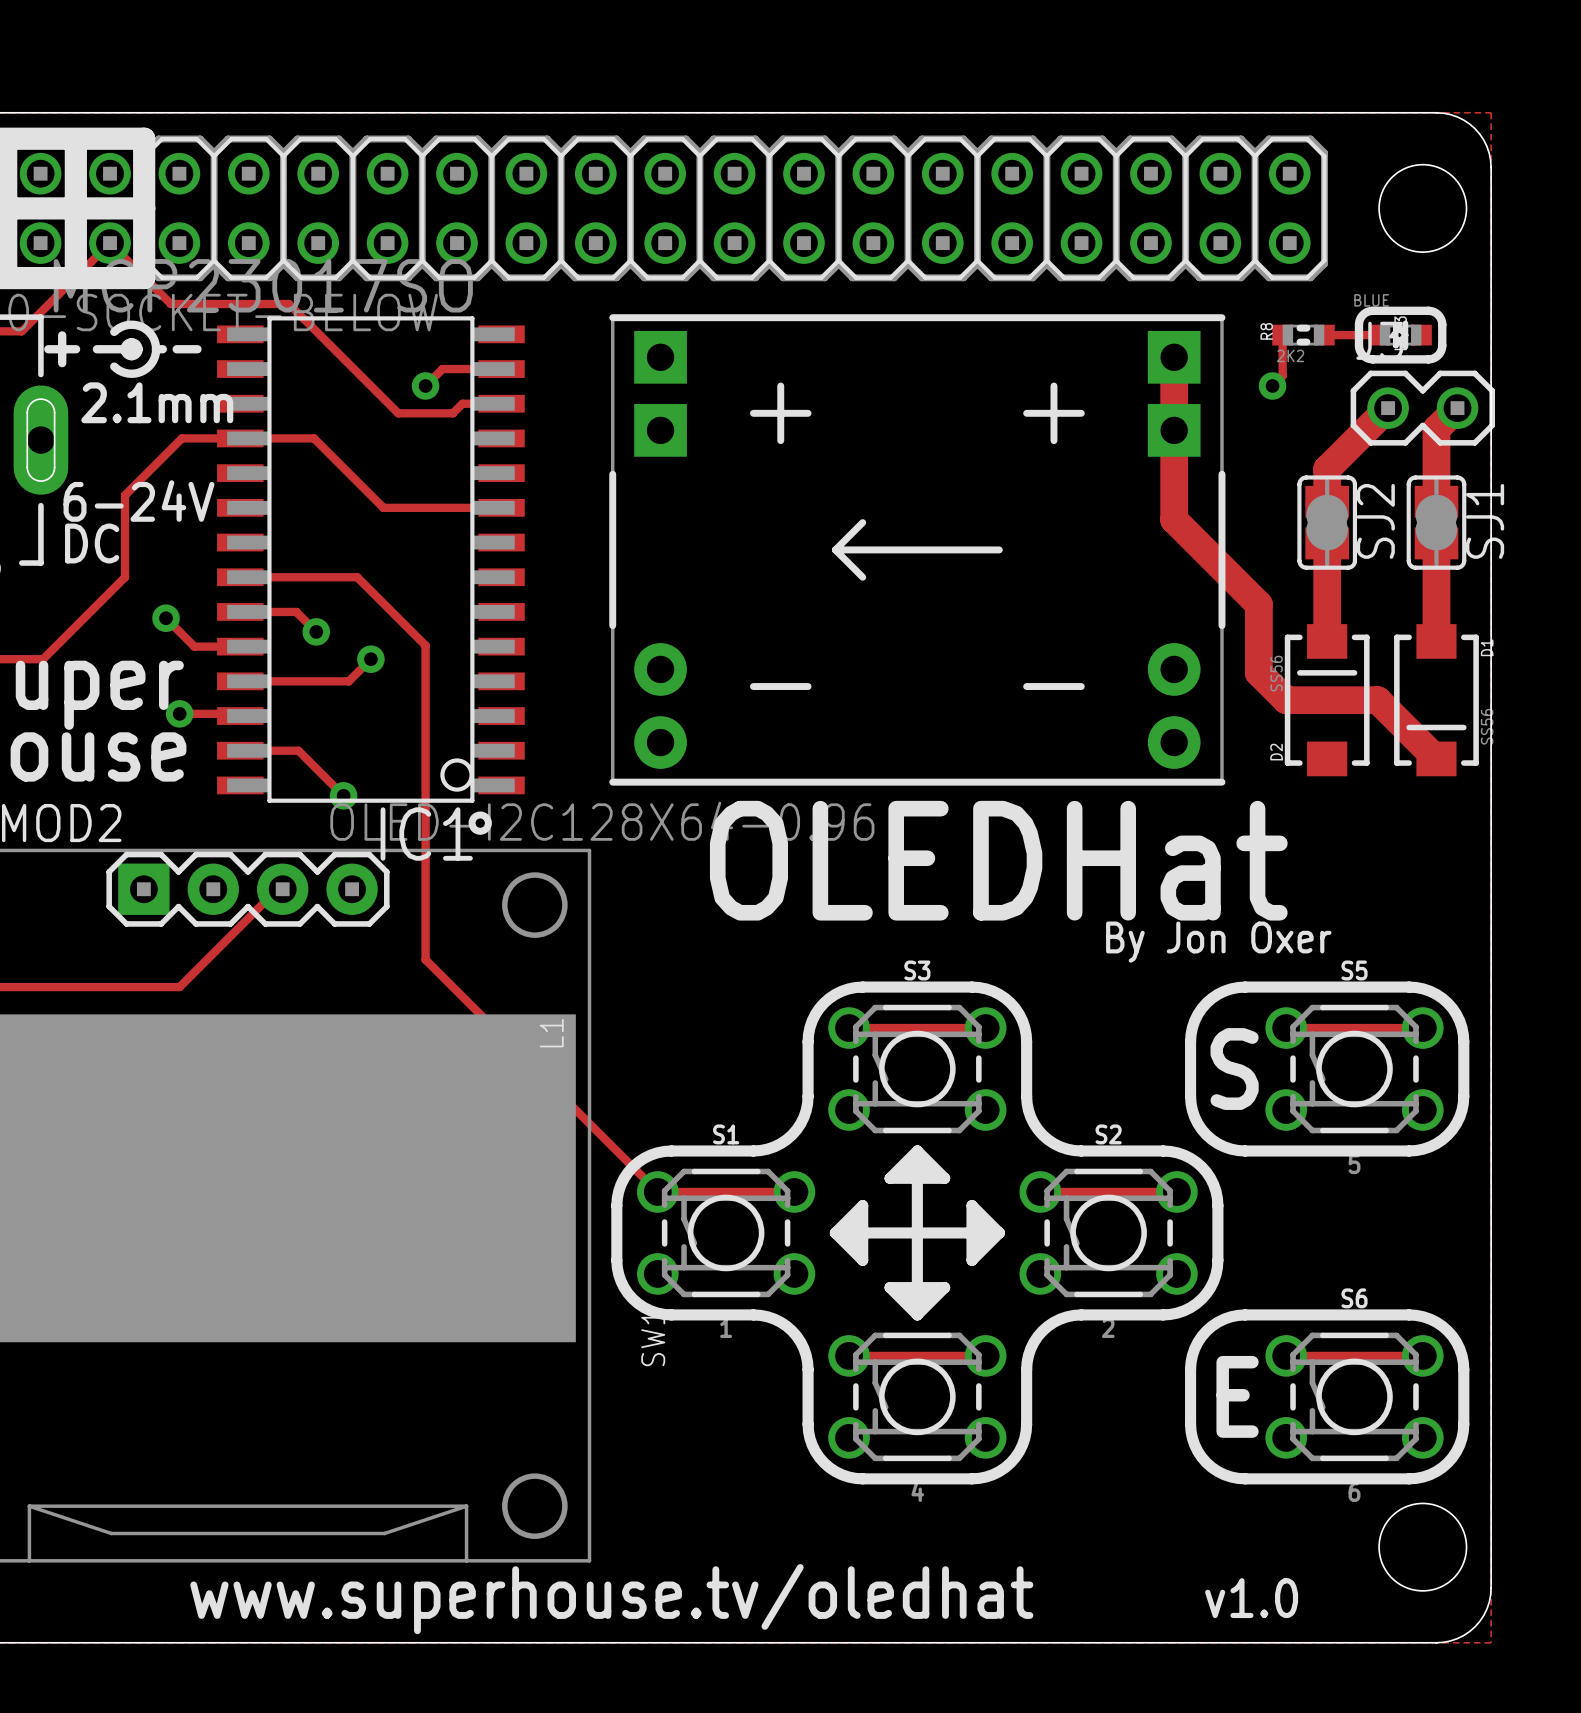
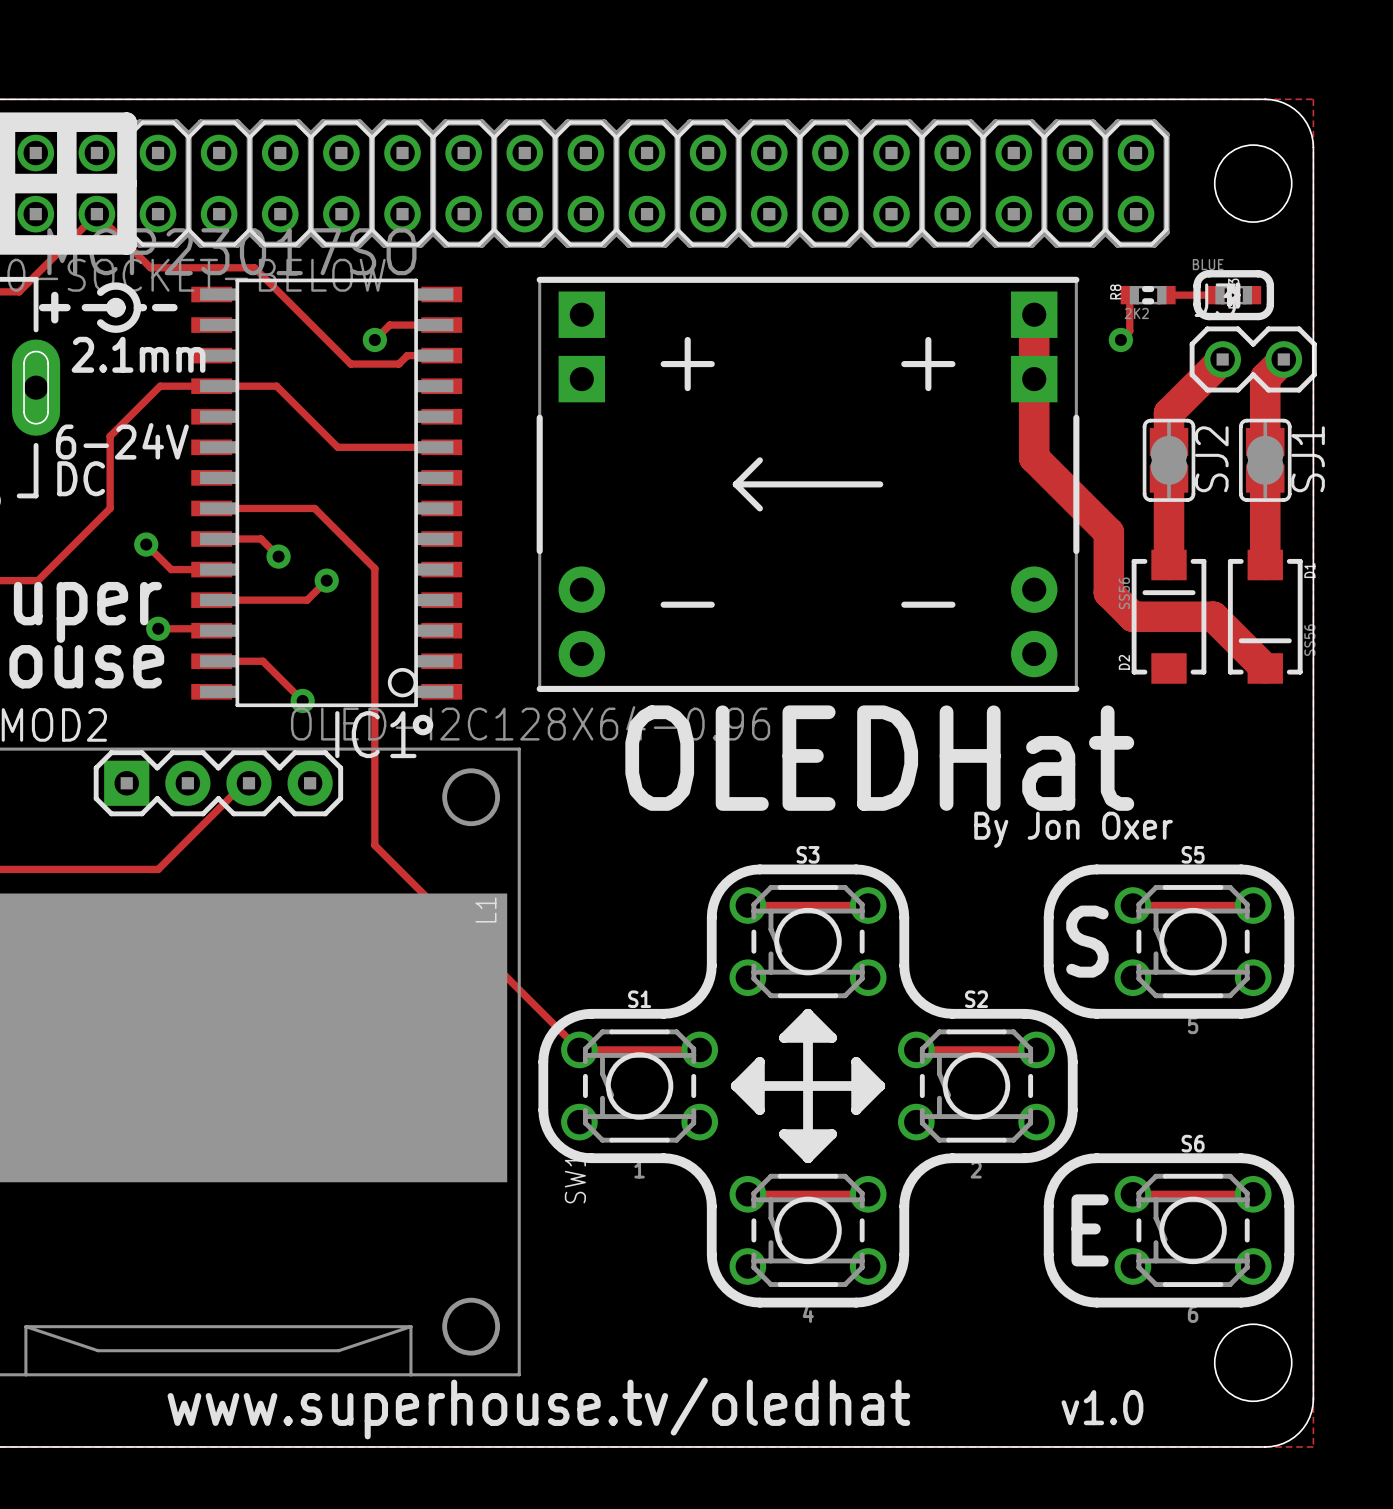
track width: thin (1174, 357) (1174, 519) (1258, 604) (1258, 672) (1286, 700) (1377, 700) (1436, 758) -> thick (1034, 314) (1034, 457) (1108, 532) (1108, 592) (1132, 616) (1213, 616) (1265, 668)
track width: thin (1388, 408) (1327, 469) (1327, 501) -> thick (1222, 359) (1169, 413) (1169, 441)
track width: thin (1457, 408) (1436, 429) (1436, 501) -> thick (1283, 359) (1265, 378) (1265, 441)
track width: thin (1327, 543) (1327, 641) -> thick (1169, 478) (1169, 565)
track width: thin (1436, 543) (1436, 641) -> thick (1265, 478) (1265, 565)

